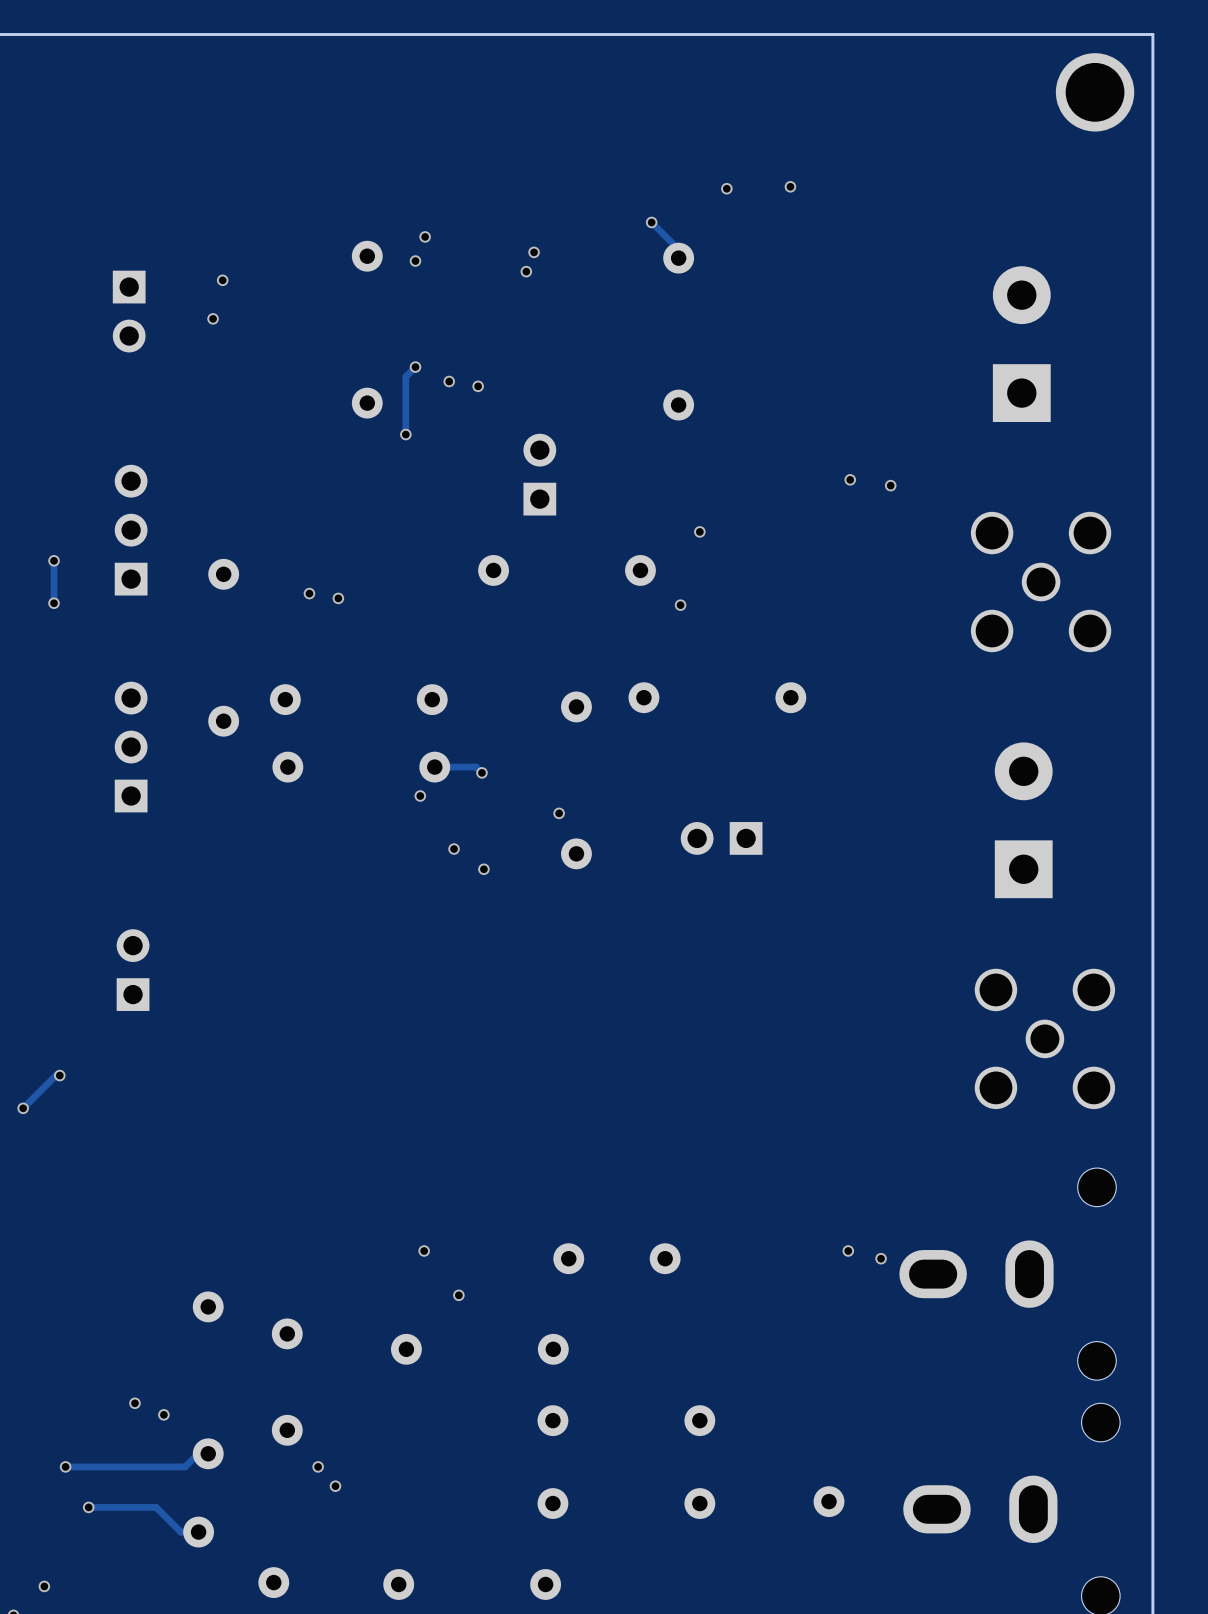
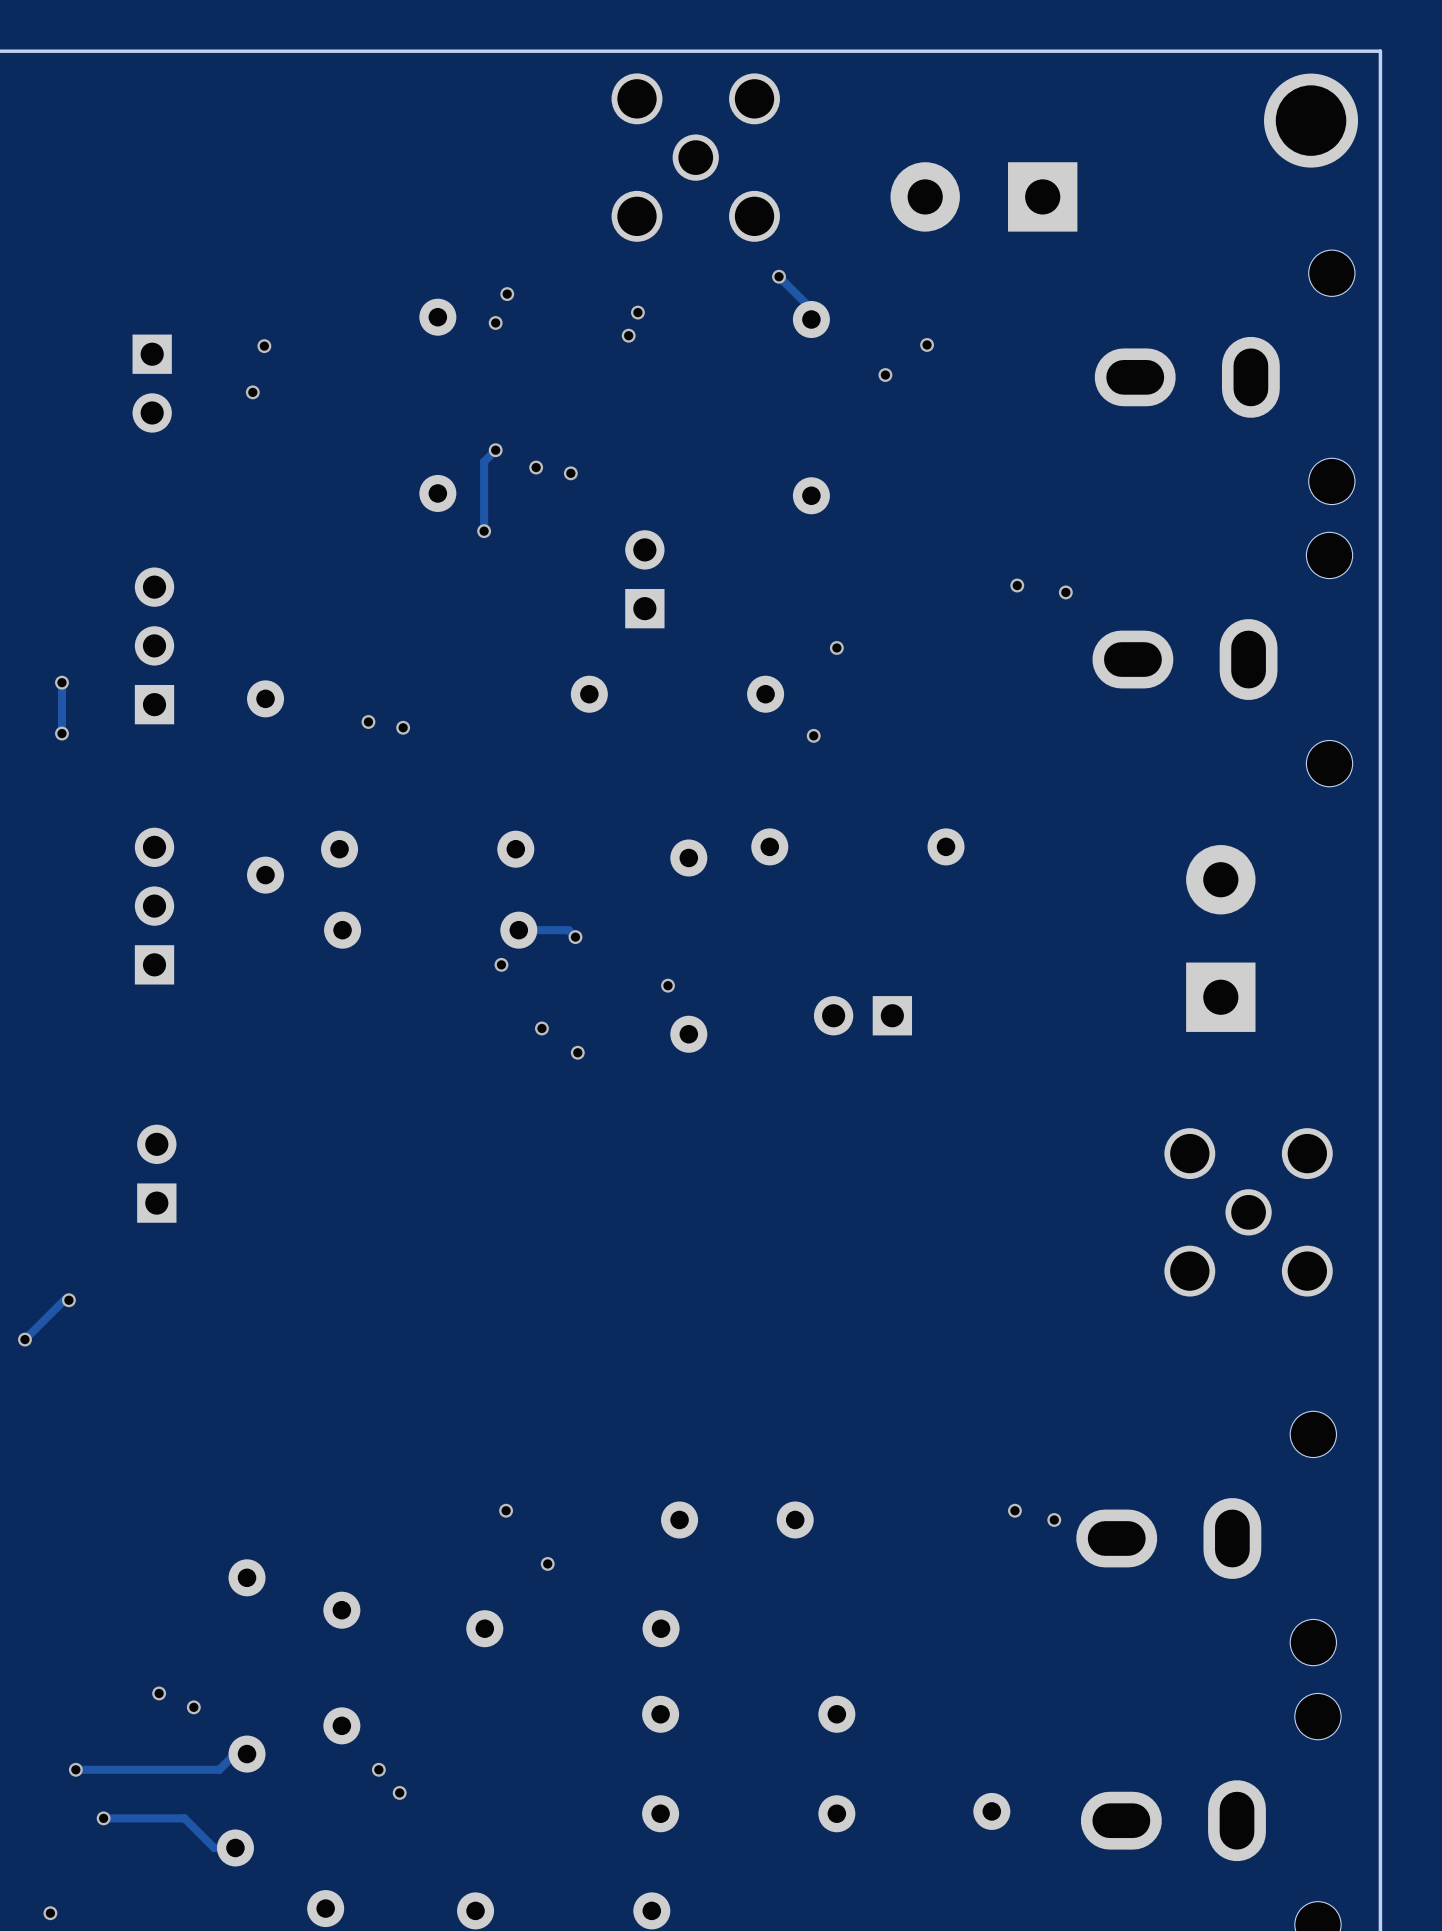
part: none -> (695, 157)
part: none -> (983, 196)
via: (790, 186) -> none
via: (726, 188) -> none
via: none -> (927, 344)
via: none -> (885, 375)
part: none -> (1224, 377)
part: (1021, 344) -> none
part: none -> (1222, 659)
part: (1041, 582) -> none
part position: (1023, 820) -> (1220, 938)
part position: (1044, 1038) -> (1248, 1212)

